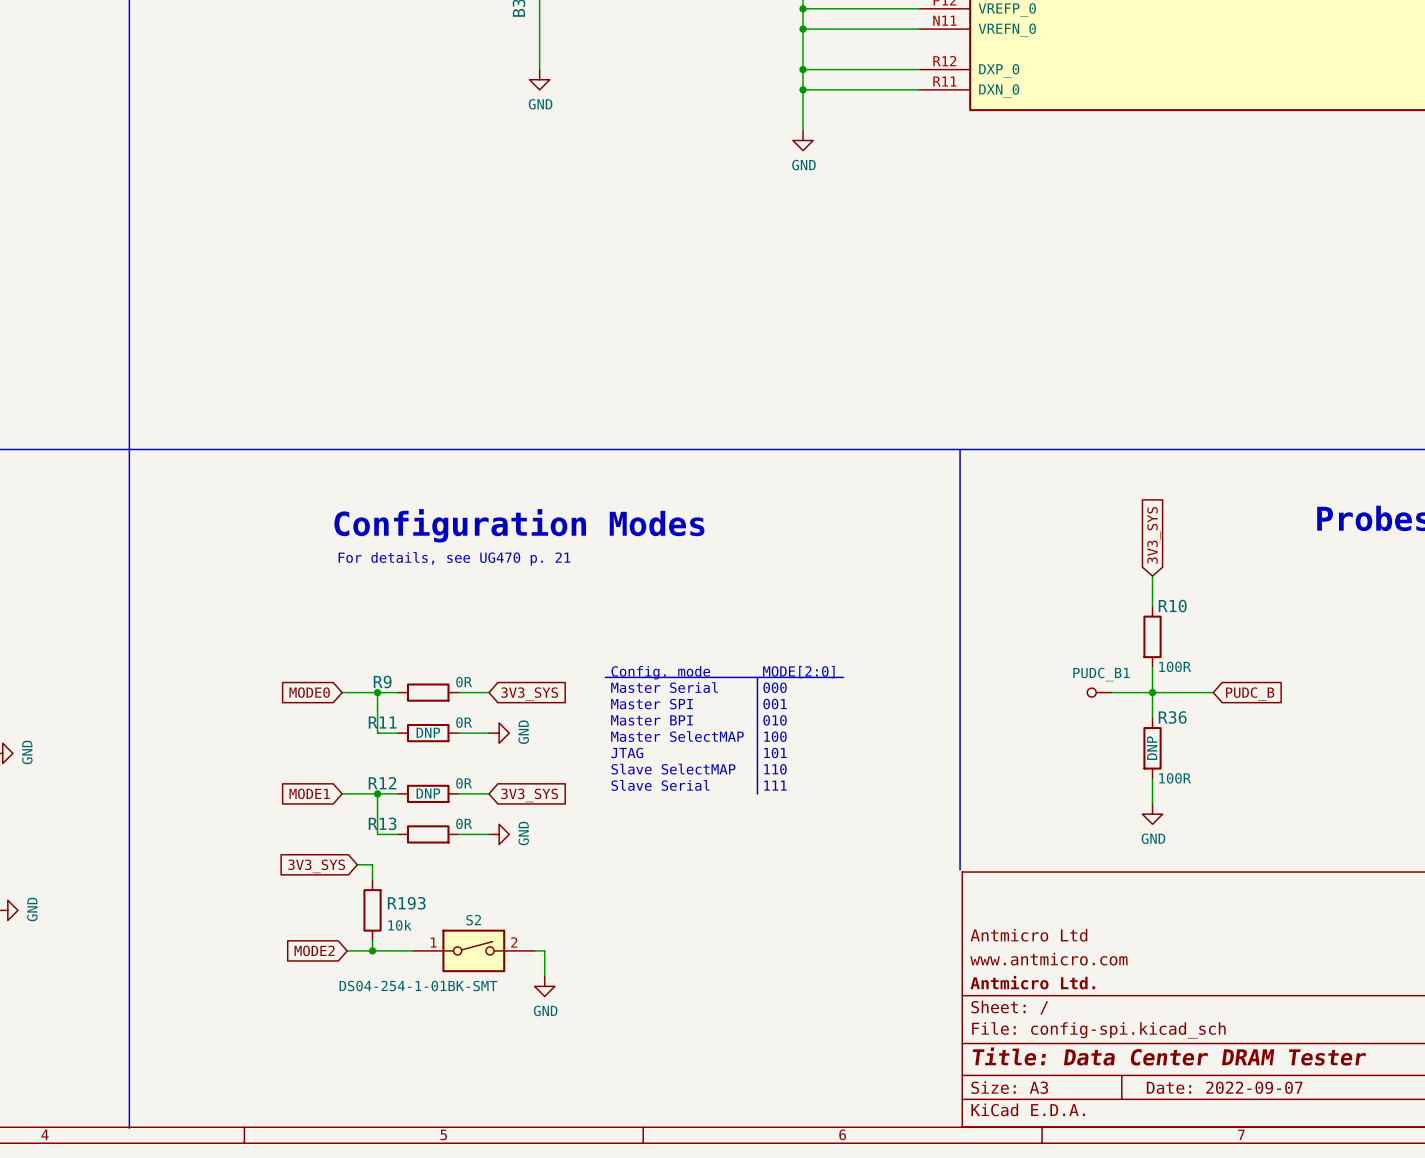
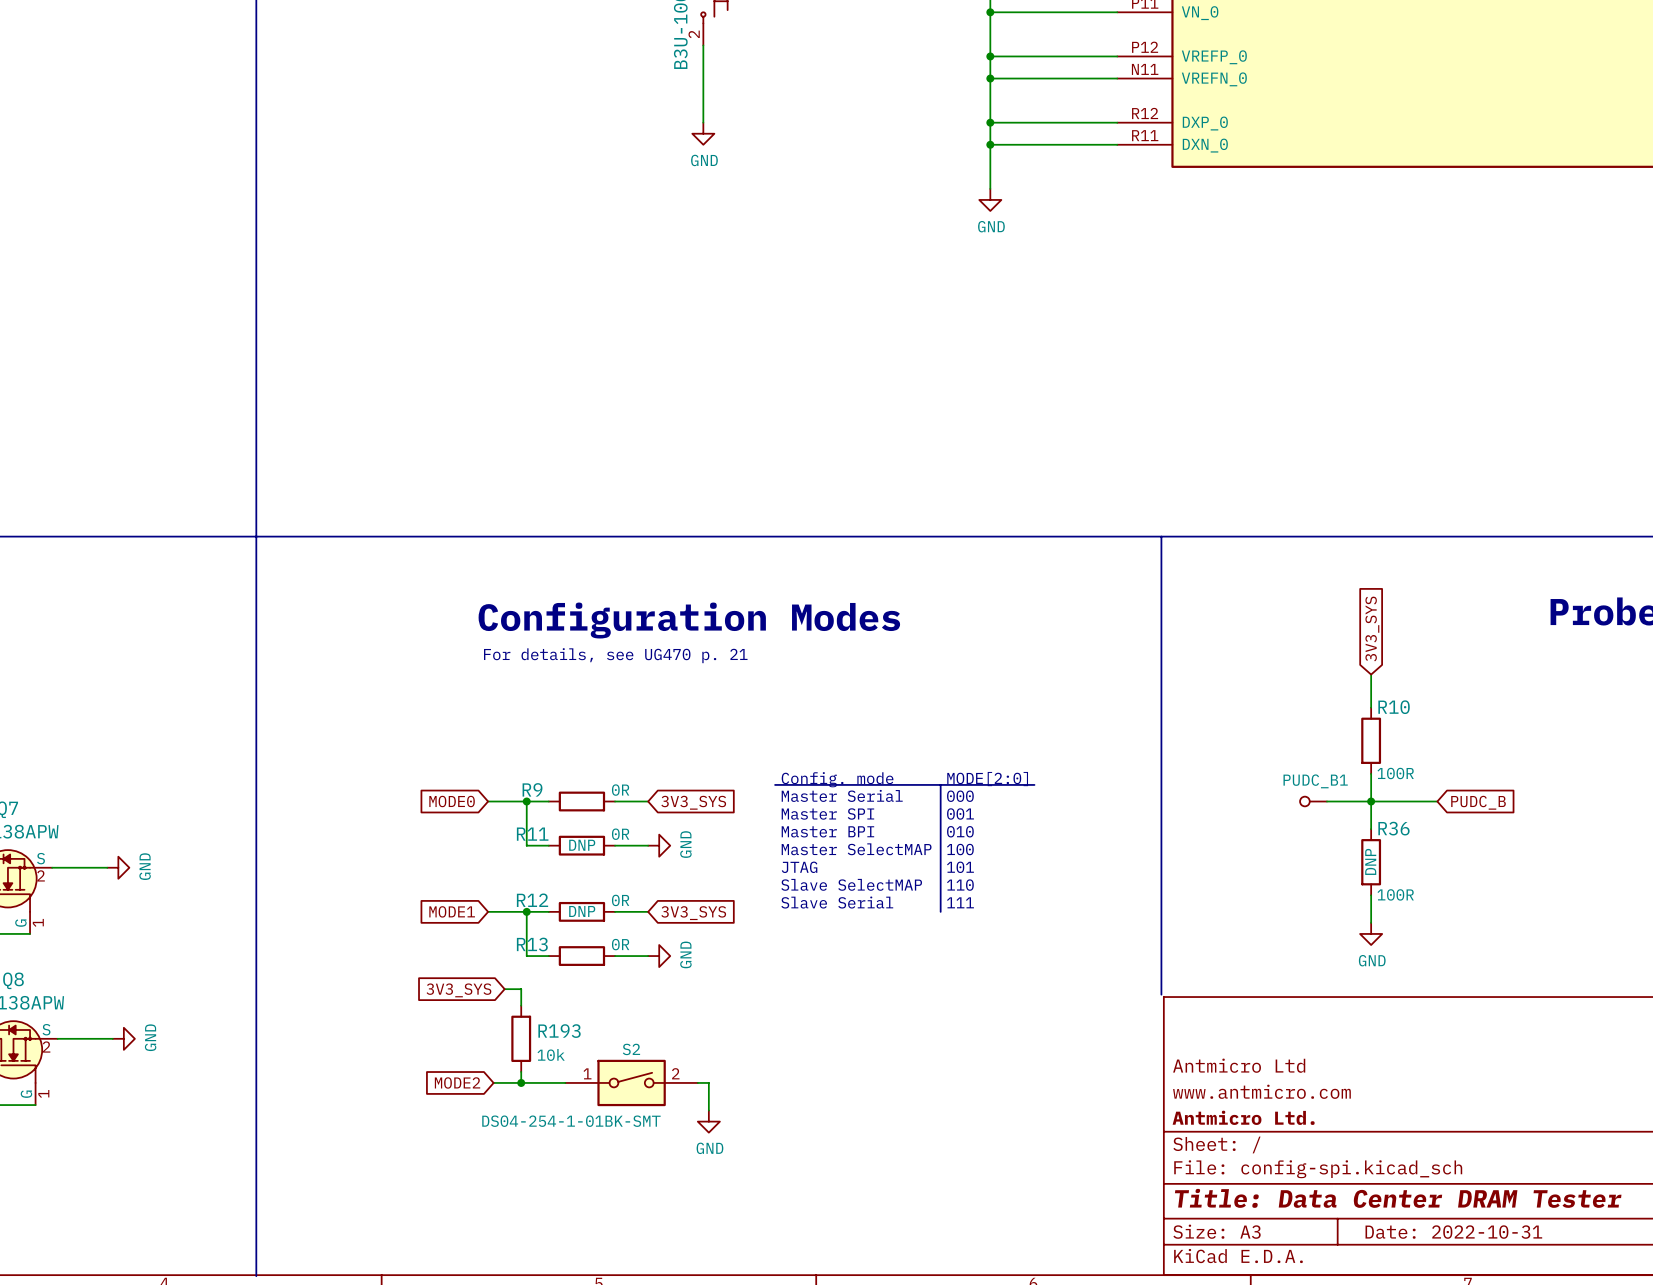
title block: Date: 2022-09-07 (1224, 1087) -> Date: 2022-10-31 (1453, 1232)

